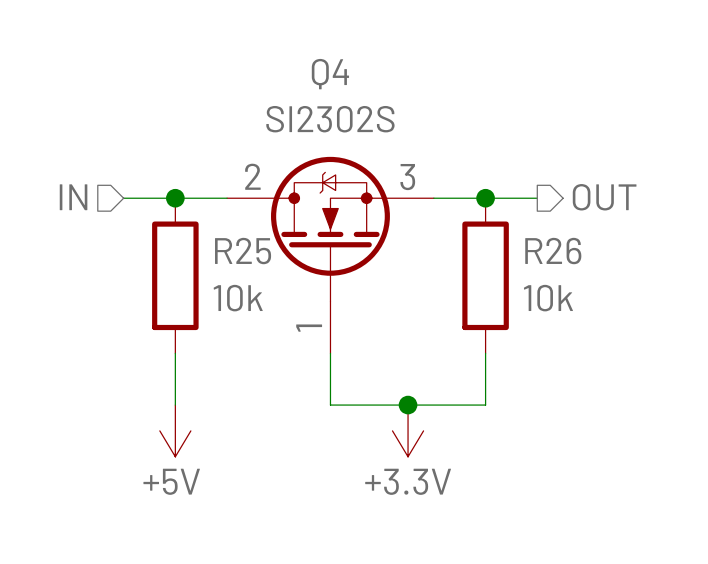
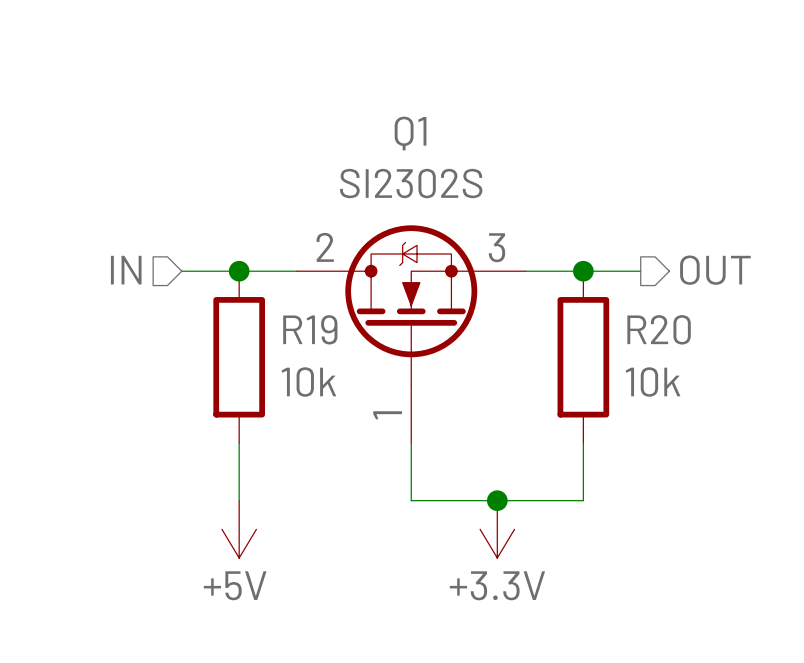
Q4 name: Q4 (330, 74) -> Q1 (410, 133)
R25 name: R25 (243, 251) -> R19 (310, 329)
R26 name: R26 (553, 251) -> R20 (659, 329)

